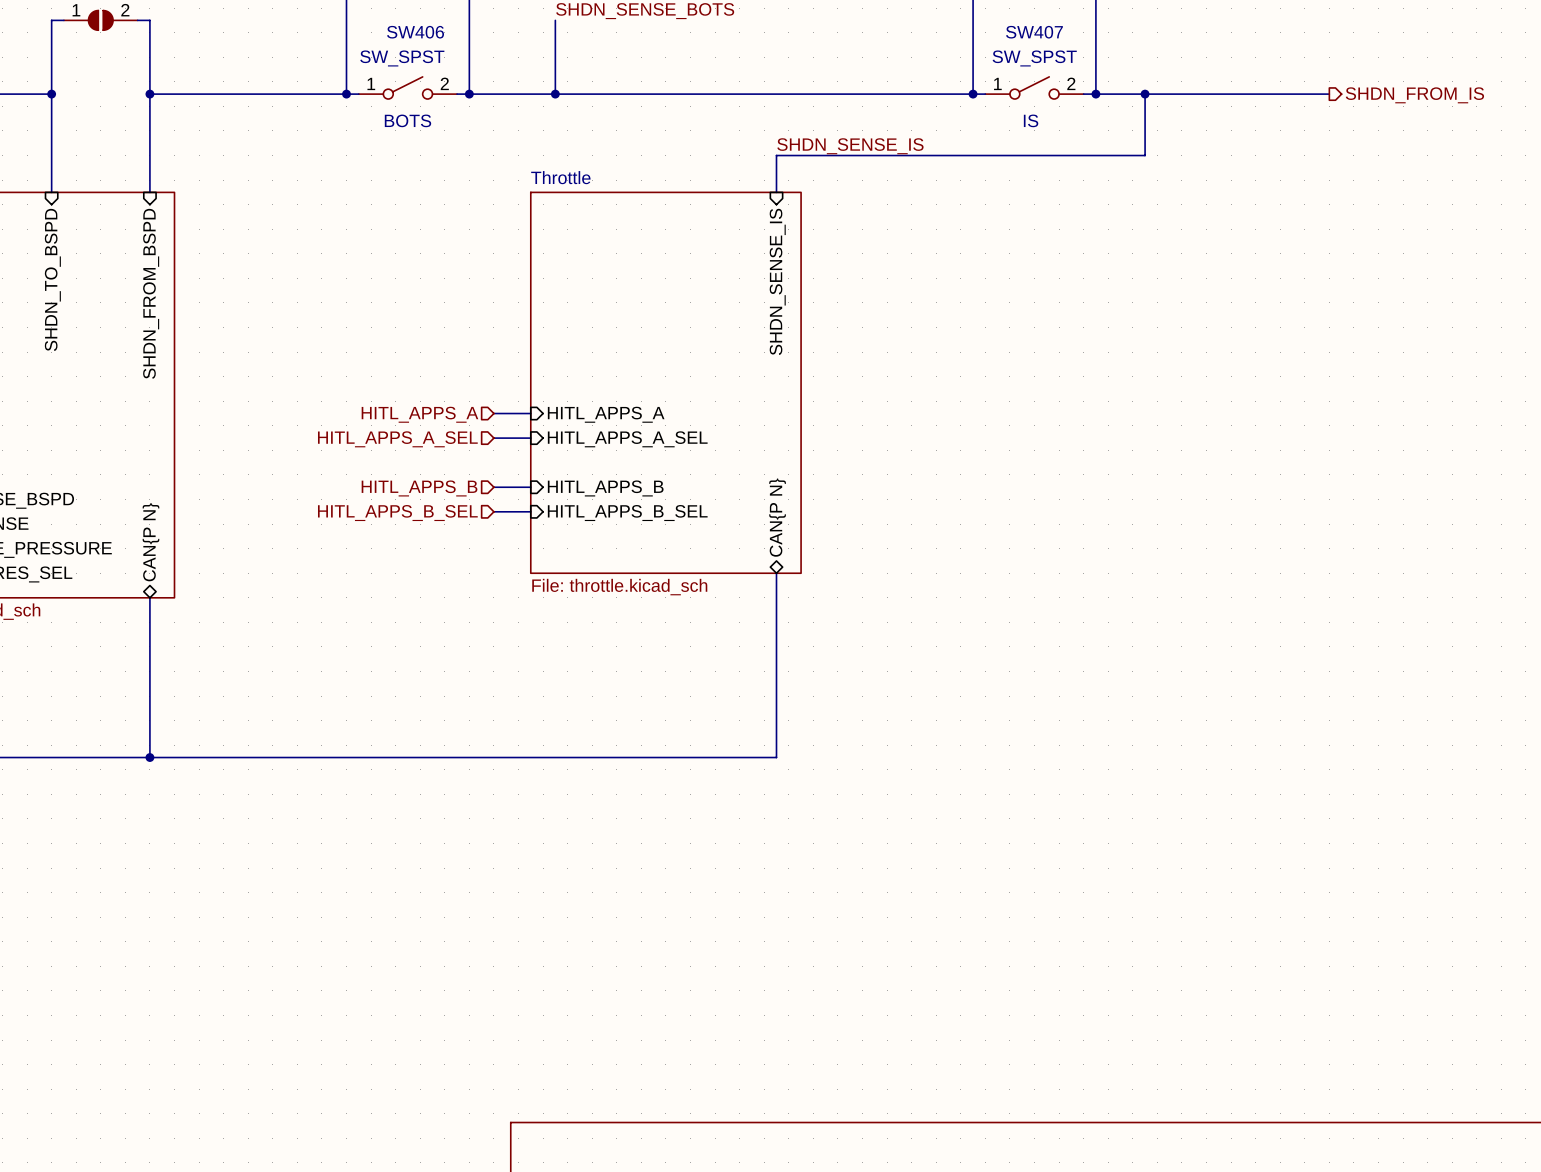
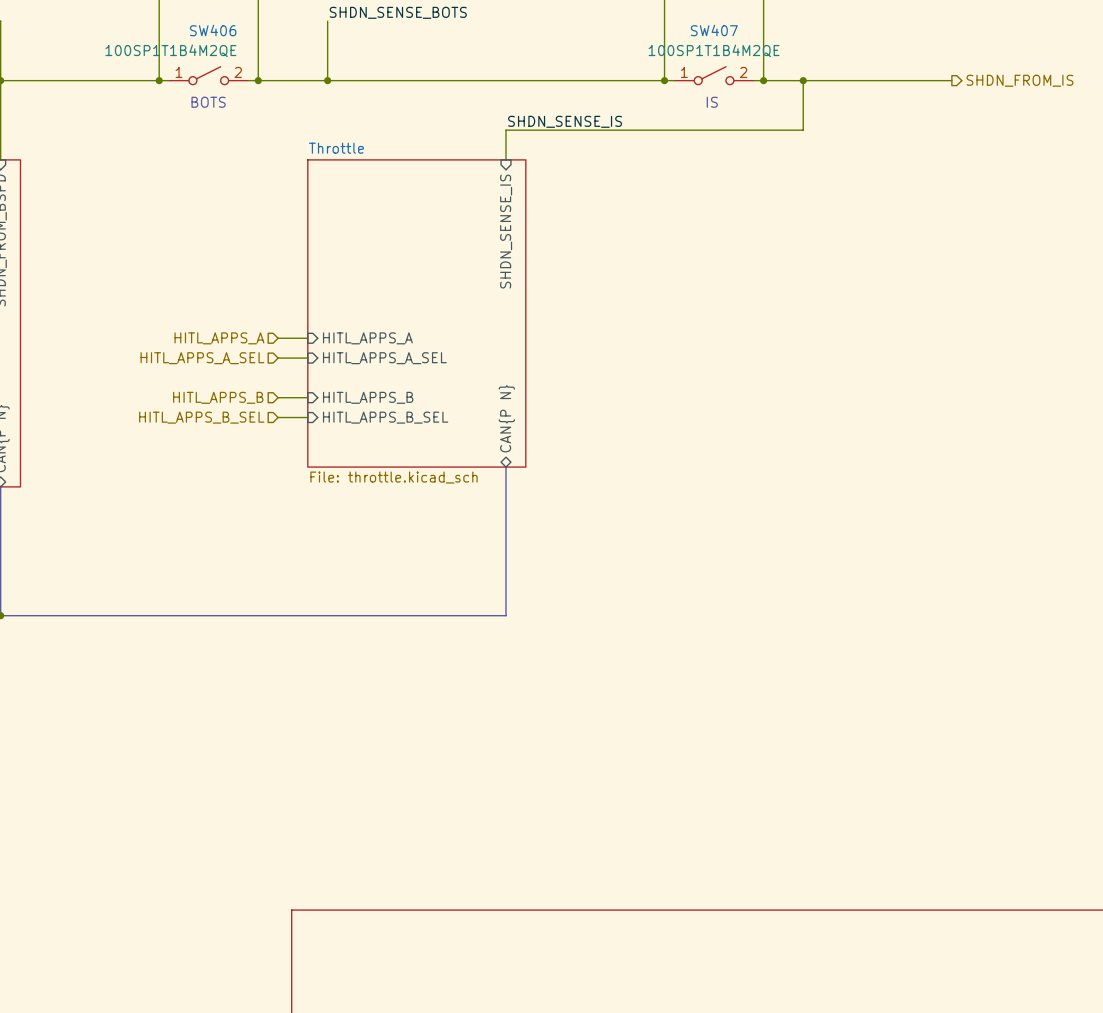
SW406 value: SW_SPST (402, 58) -> 100SP1T1B4M2QE (170, 50)
SW407 value: SW_SPST (1034, 58) -> 100SP1T1B4M2QE (714, 50)

